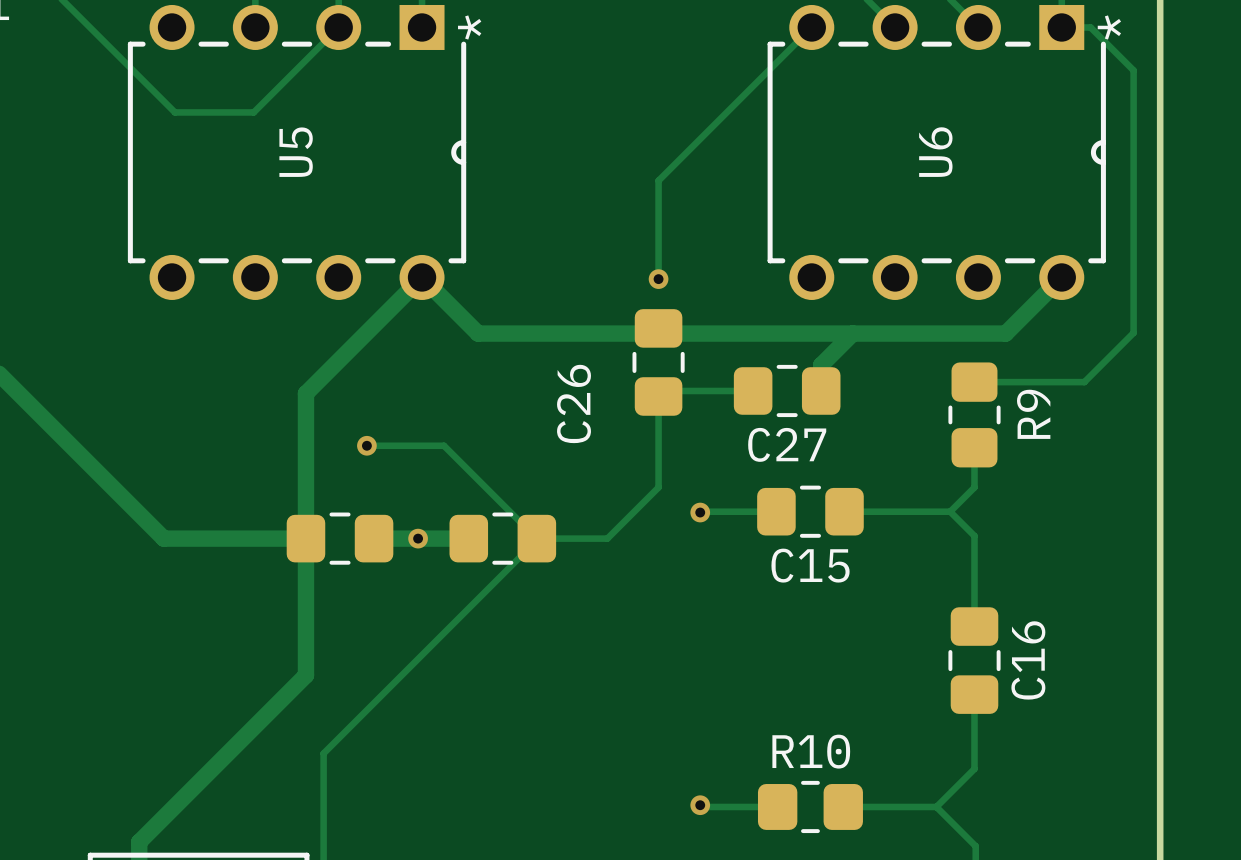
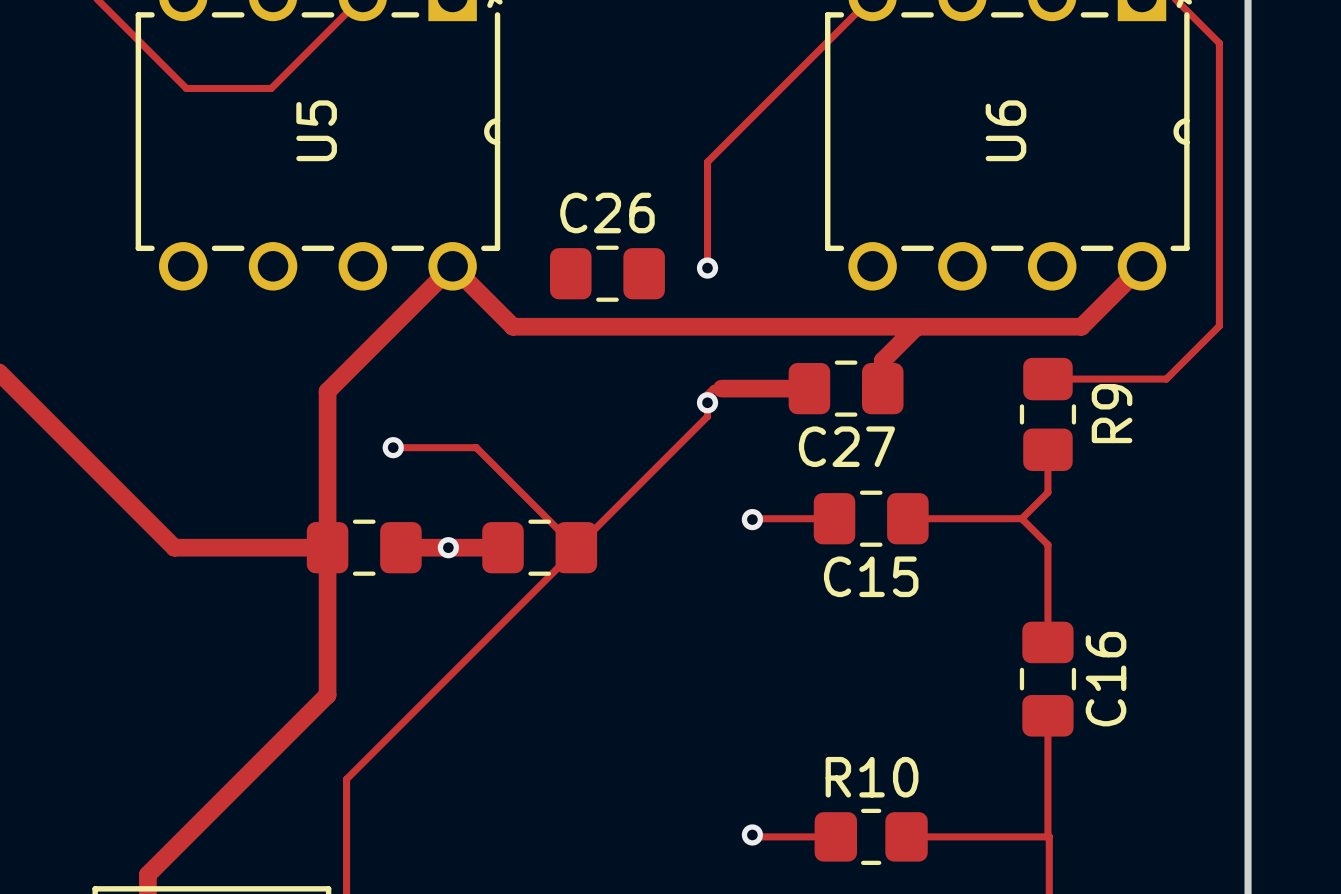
C26 rotation: 0° (658, 362) -> 90° clockwise (607, 273)
C26 position: (658, 362) -> (607, 273)
track width: thin (671, 390) (753, 390) -> thick (721, 388) (809, 388)
via: none -> (707, 402)
track: (658, 416) (658, 487) (607, 538) (536, 538) -> (707, 416) (576, 547)
track: (974, 768) (936, 806) (975, 846) -> (1049, 836) (1049, 879)
track: none -> (1047, 795) (1049, 836)
track: none -> (1006, 836) (1049, 836)

